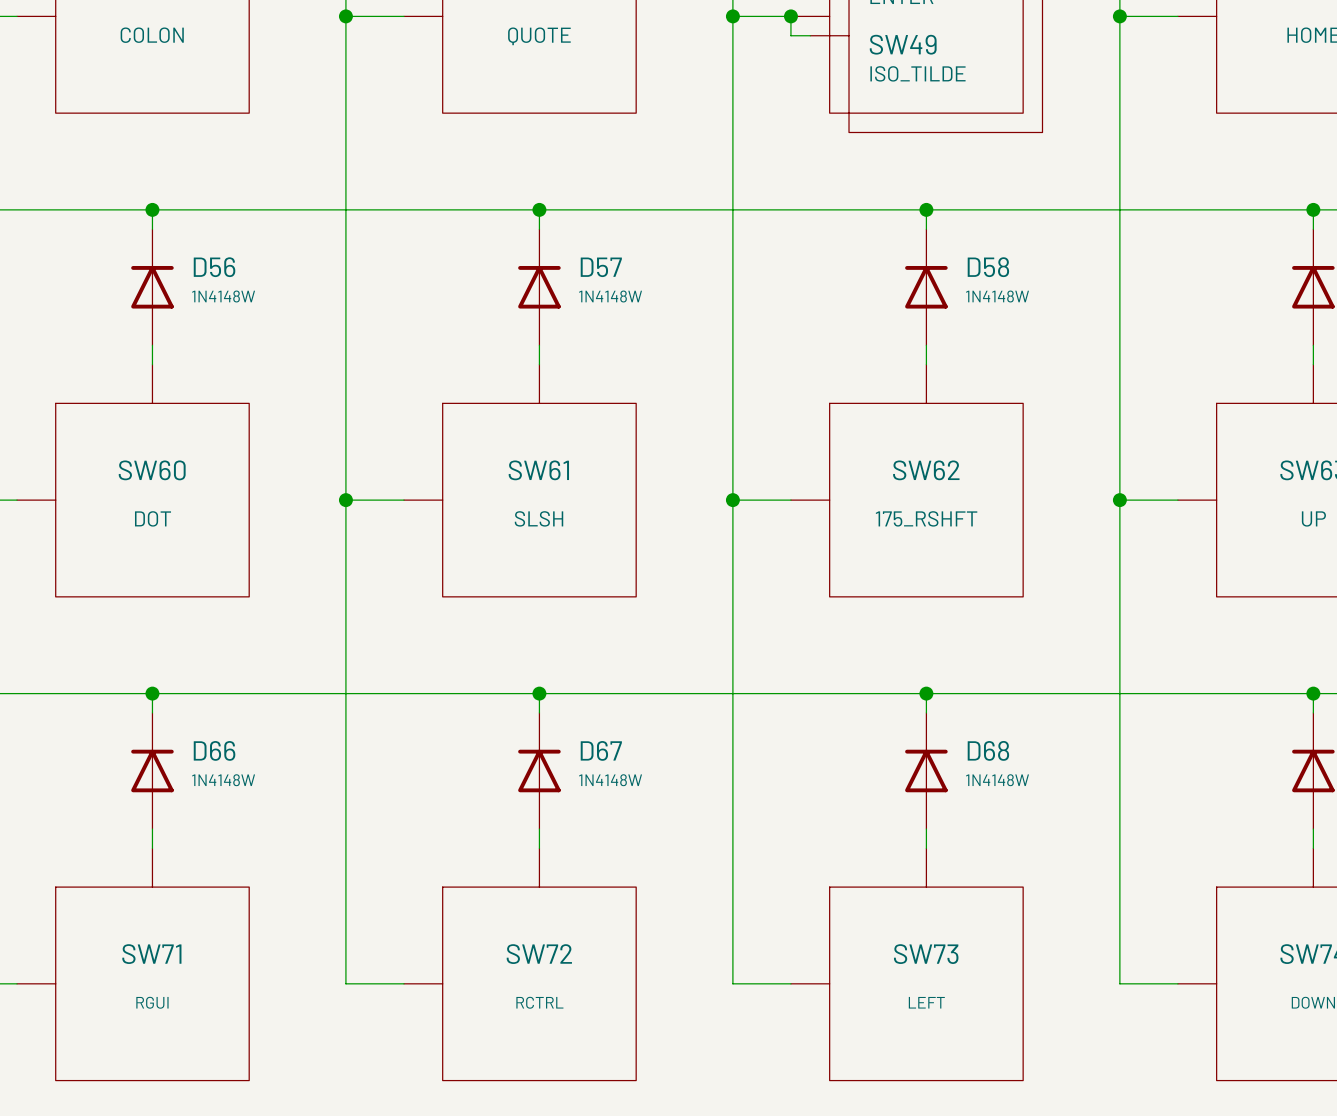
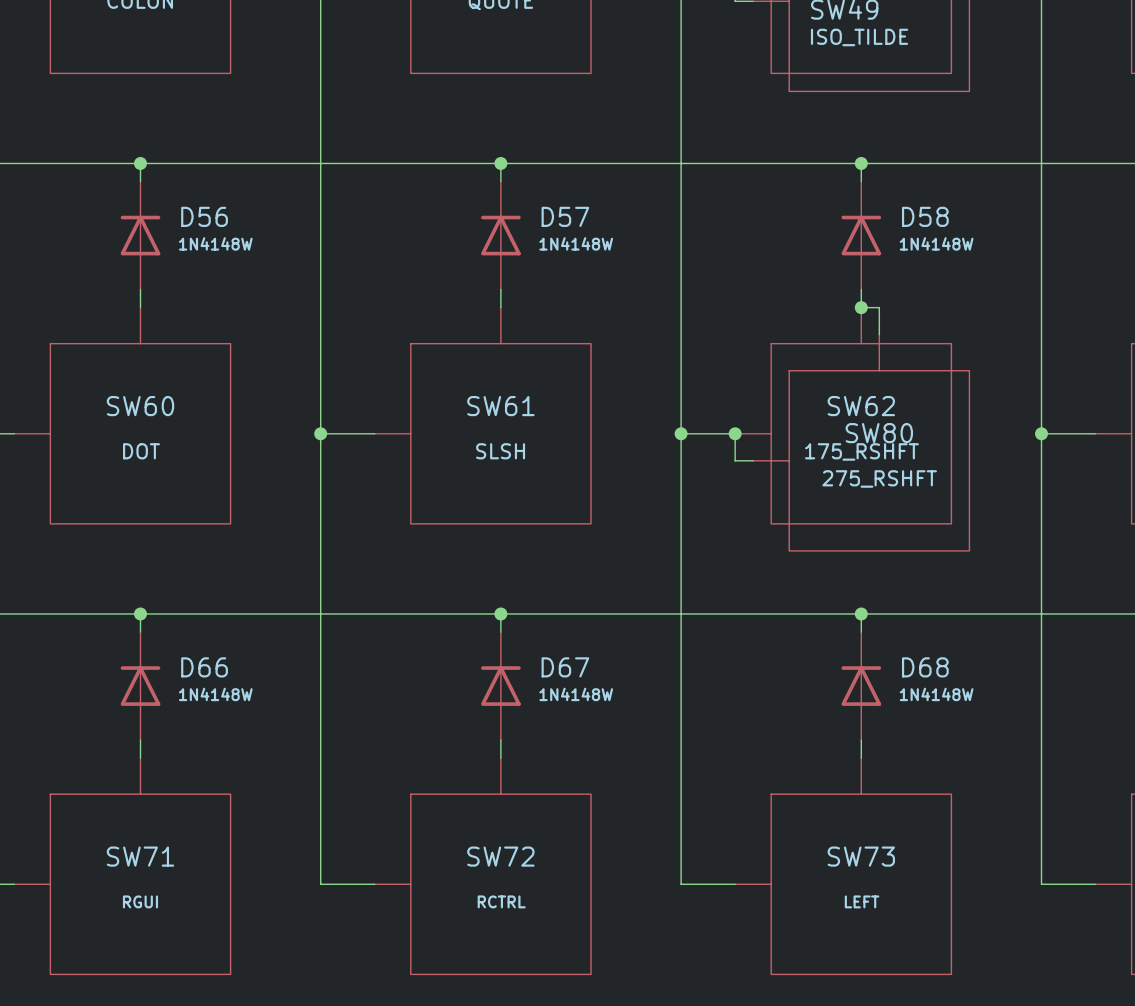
wire: none -> (861, 307) (879, 307) (879, 334)
junction: none -> (861, 307)
wire: none -> (735, 433) (735, 460) (753, 460)
junction: none -> (735, 433)
SW80: none -> 275_RSHFT (861, 442)

